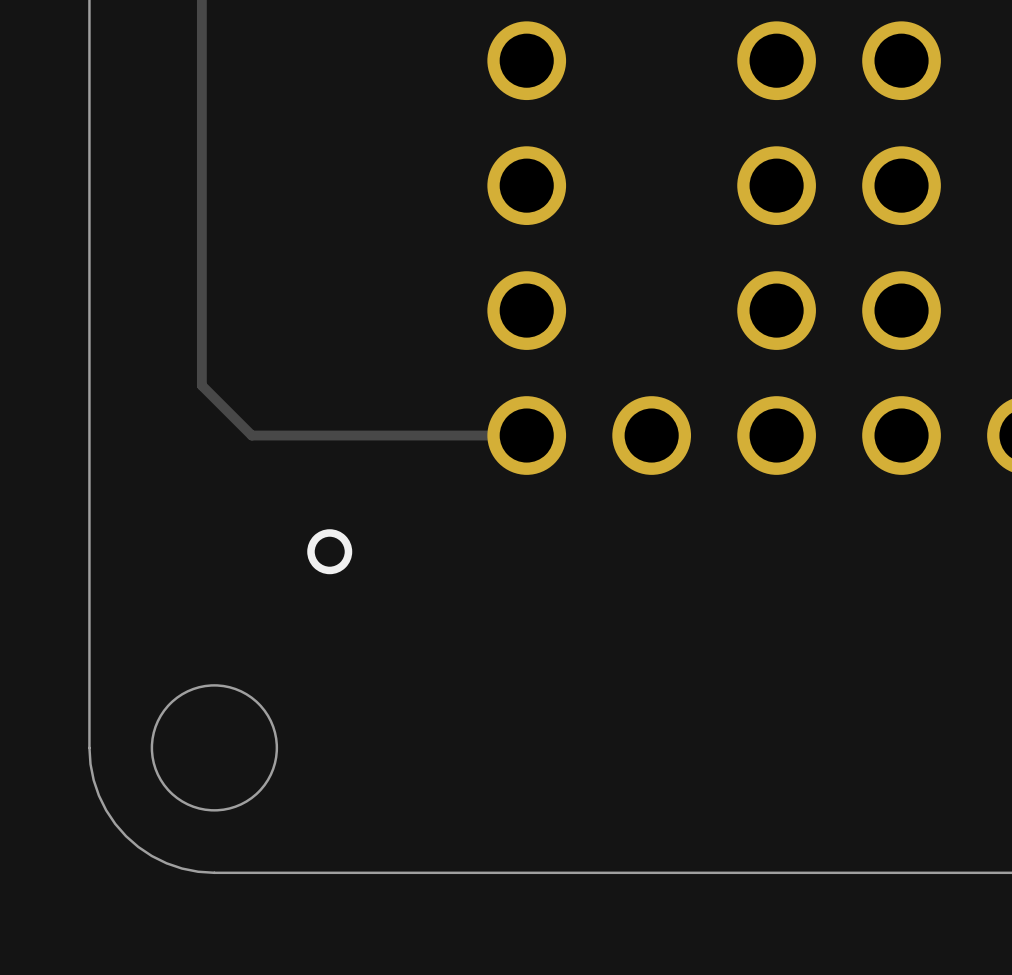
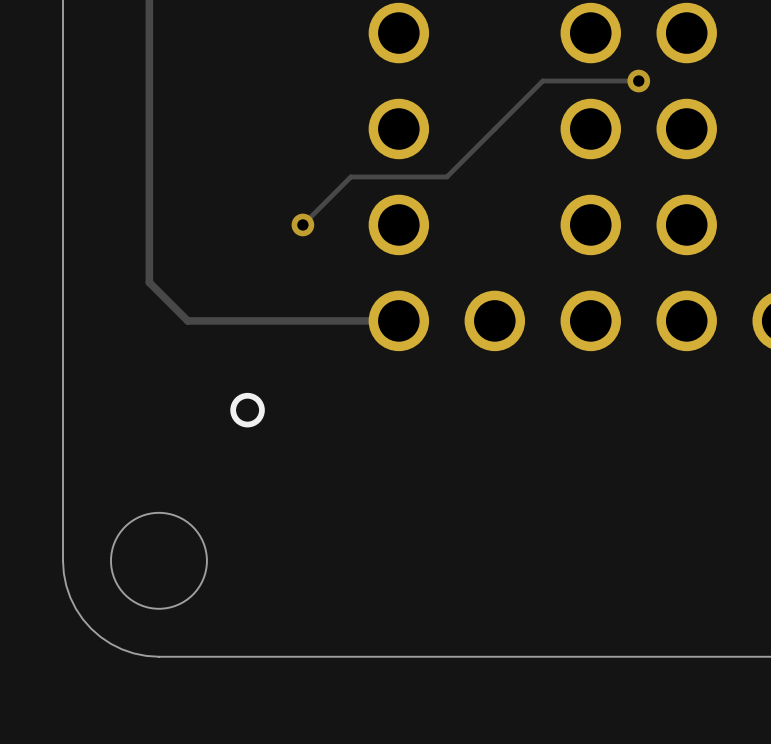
track: none -> (638, 81) (542, 81) (446, 176) (350, 176) (302, 224)
via: none -> (638, 81)
via: none -> (302, 224)

